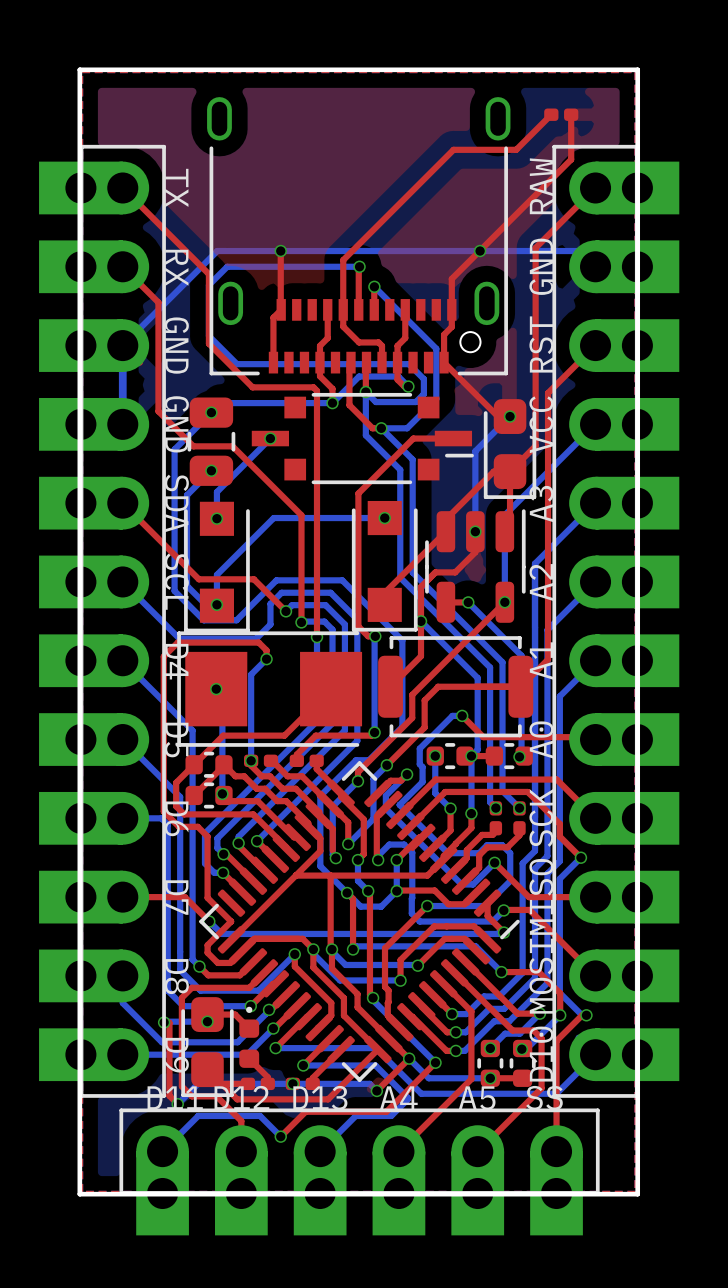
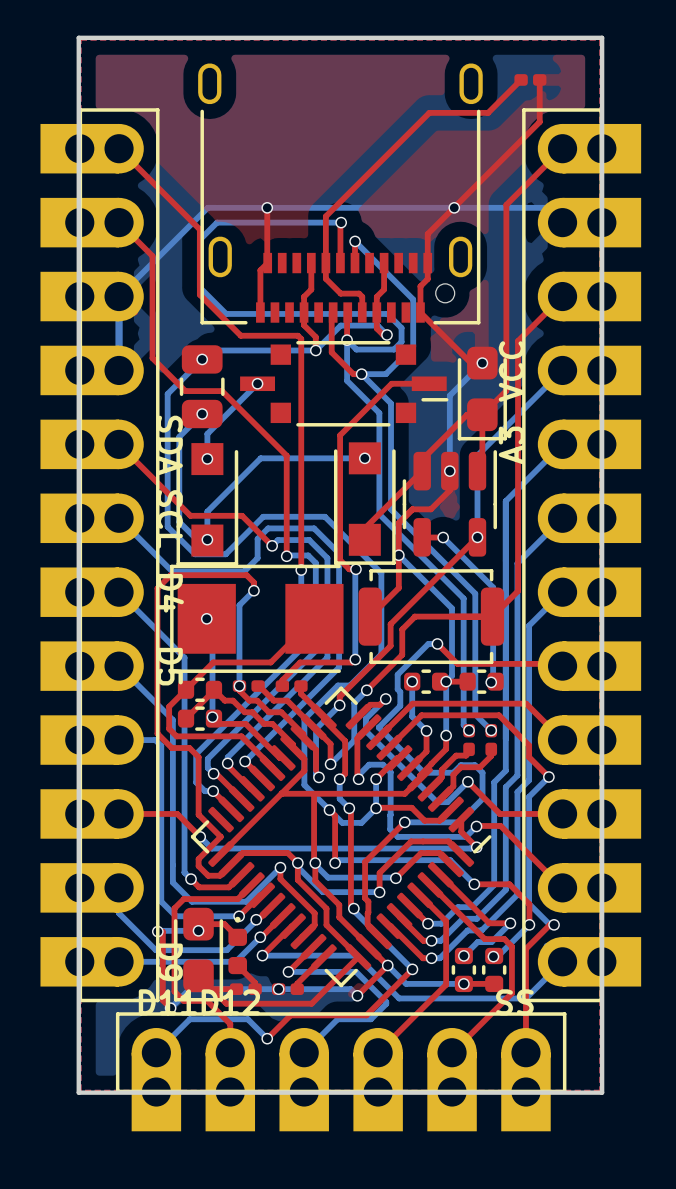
text: RAW (541, 186) -> none
text: TX (176, 187) -> none
text: GND (541, 266) -> none
text: RX (176, 267) -> none
text: RST (541, 344) -> none
text: GND (176, 345) -> none
text: GND (176, 424) -> none
text: A2 (541, 582) -> none
text: A1 (541, 661) -> none
text: A0 (541, 739) -> none
text: SCK (541, 817) -> none
text: D6 (176, 818) -> none
text: MISO (541, 896) -> none
text: D7 (176, 897) -> none
text: D8 (176, 976) -> none
text: MOSI (541, 976) -> none
text: D10 (541, 1054) -> none
text: D13 (320, 1097) -> none
text: A4 (398, 1097) -> none
text: A5 (477, 1098) -> none

